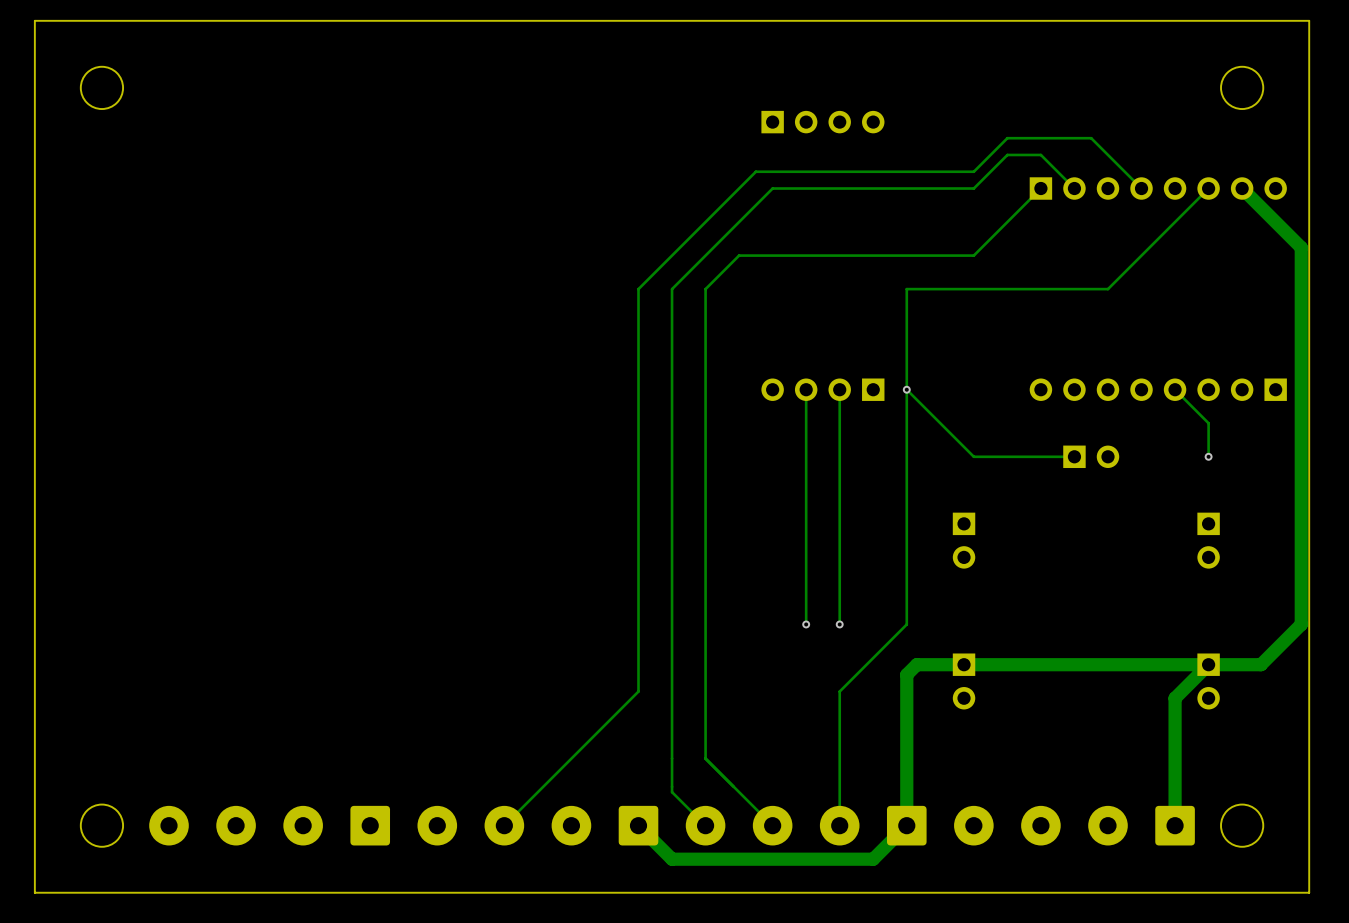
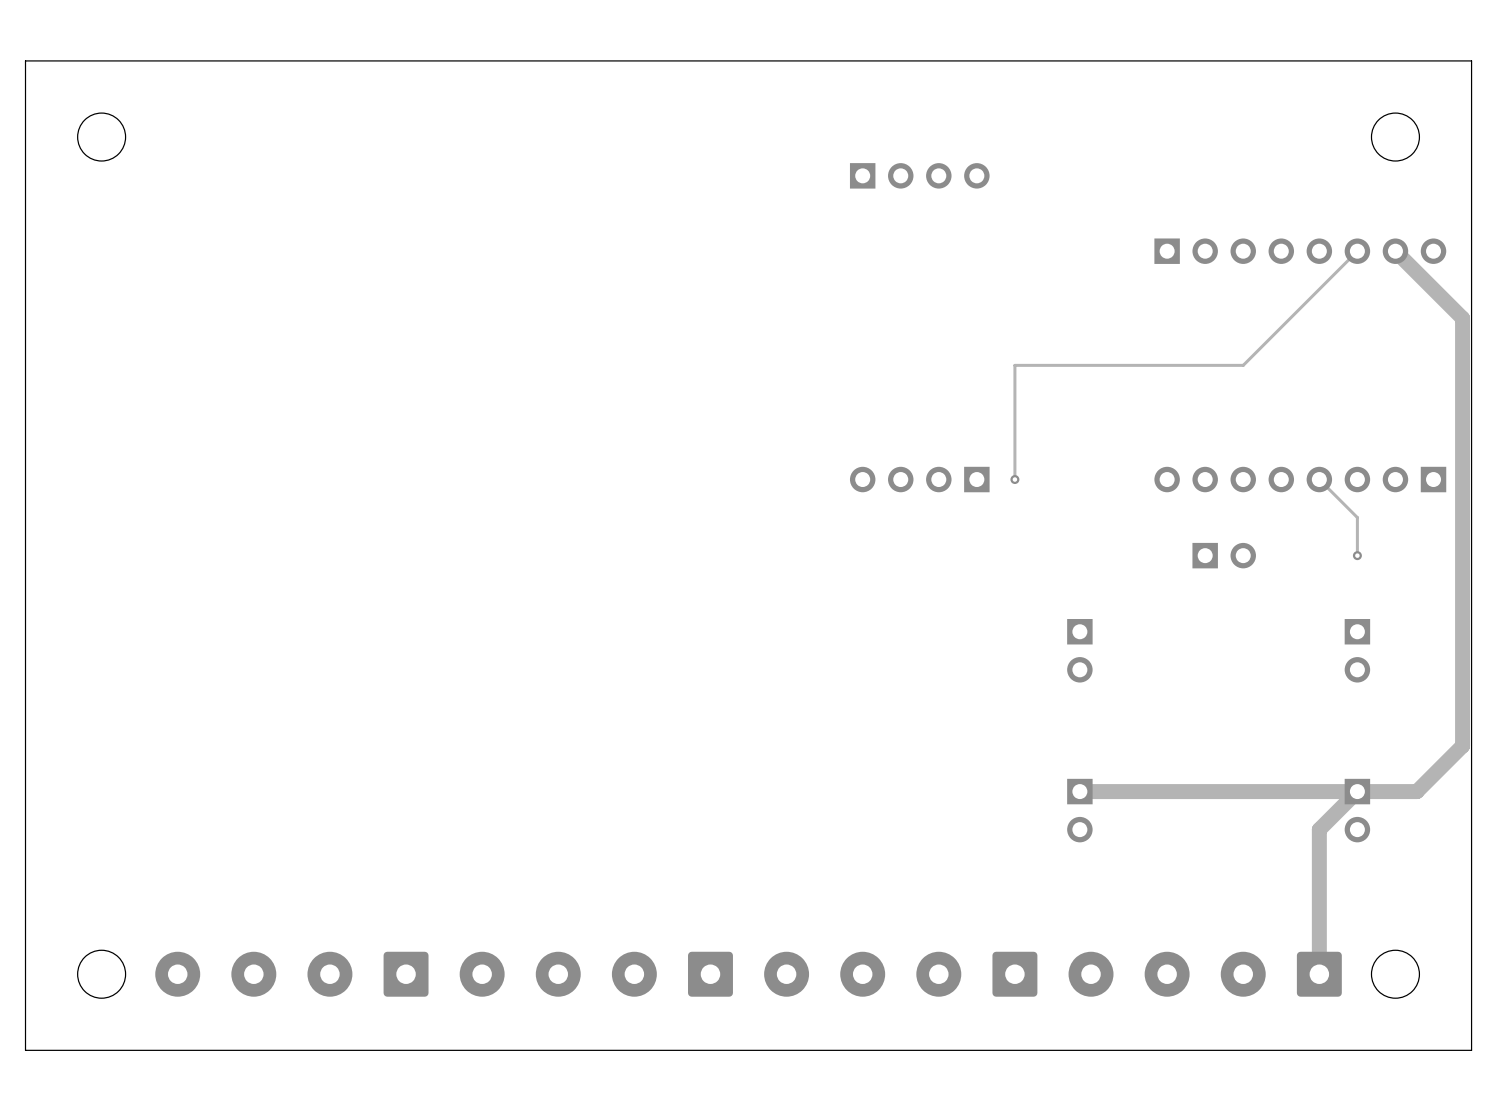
track: (1040, 188) (973, 255) (739, 255) (705, 289) (705, 758) (772, 825) -> none
track: (1074, 188) (1040, 154) (1007, 154) (973, 188) (772, 188) (672, 289) (672, 792) (705, 825) -> none
track: (1141, 188) (1091, 138) (1007, 138) (973, 171) (755, 171) (638, 289) (638, 691) (504, 825) -> none
track: (806, 389) (806, 624) -> none
track: (839, 389) (839, 624) -> none
track: (1074, 456) (973, 456) (906, 389) (906, 624) (839, 691) (839, 825) -> none
via: (806, 624) -> none
via: (839, 624) -> none
track: (964, 664) (916, 664) (906, 674) (906, 825) (873, 859) (672, 859) (638, 825) -> none

